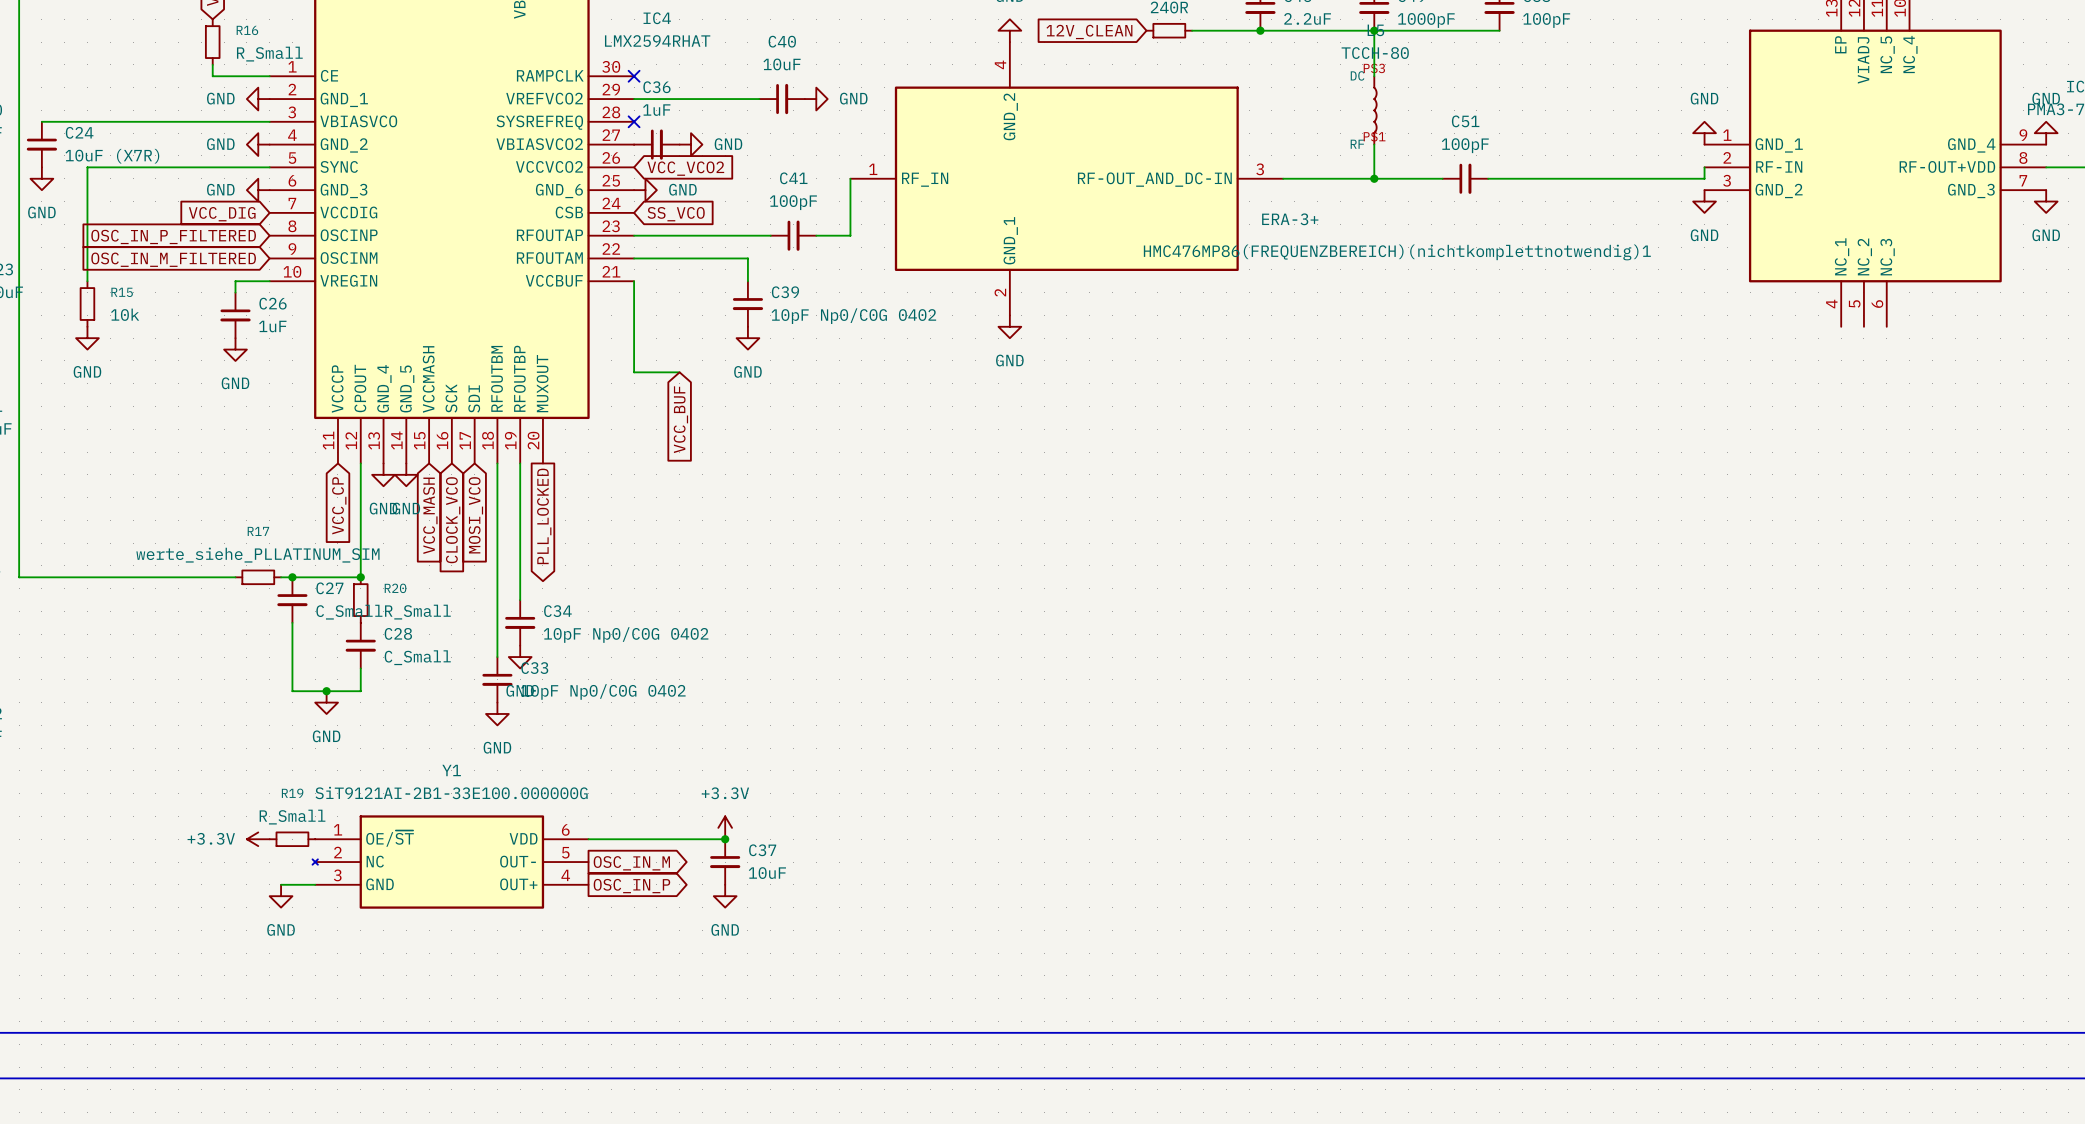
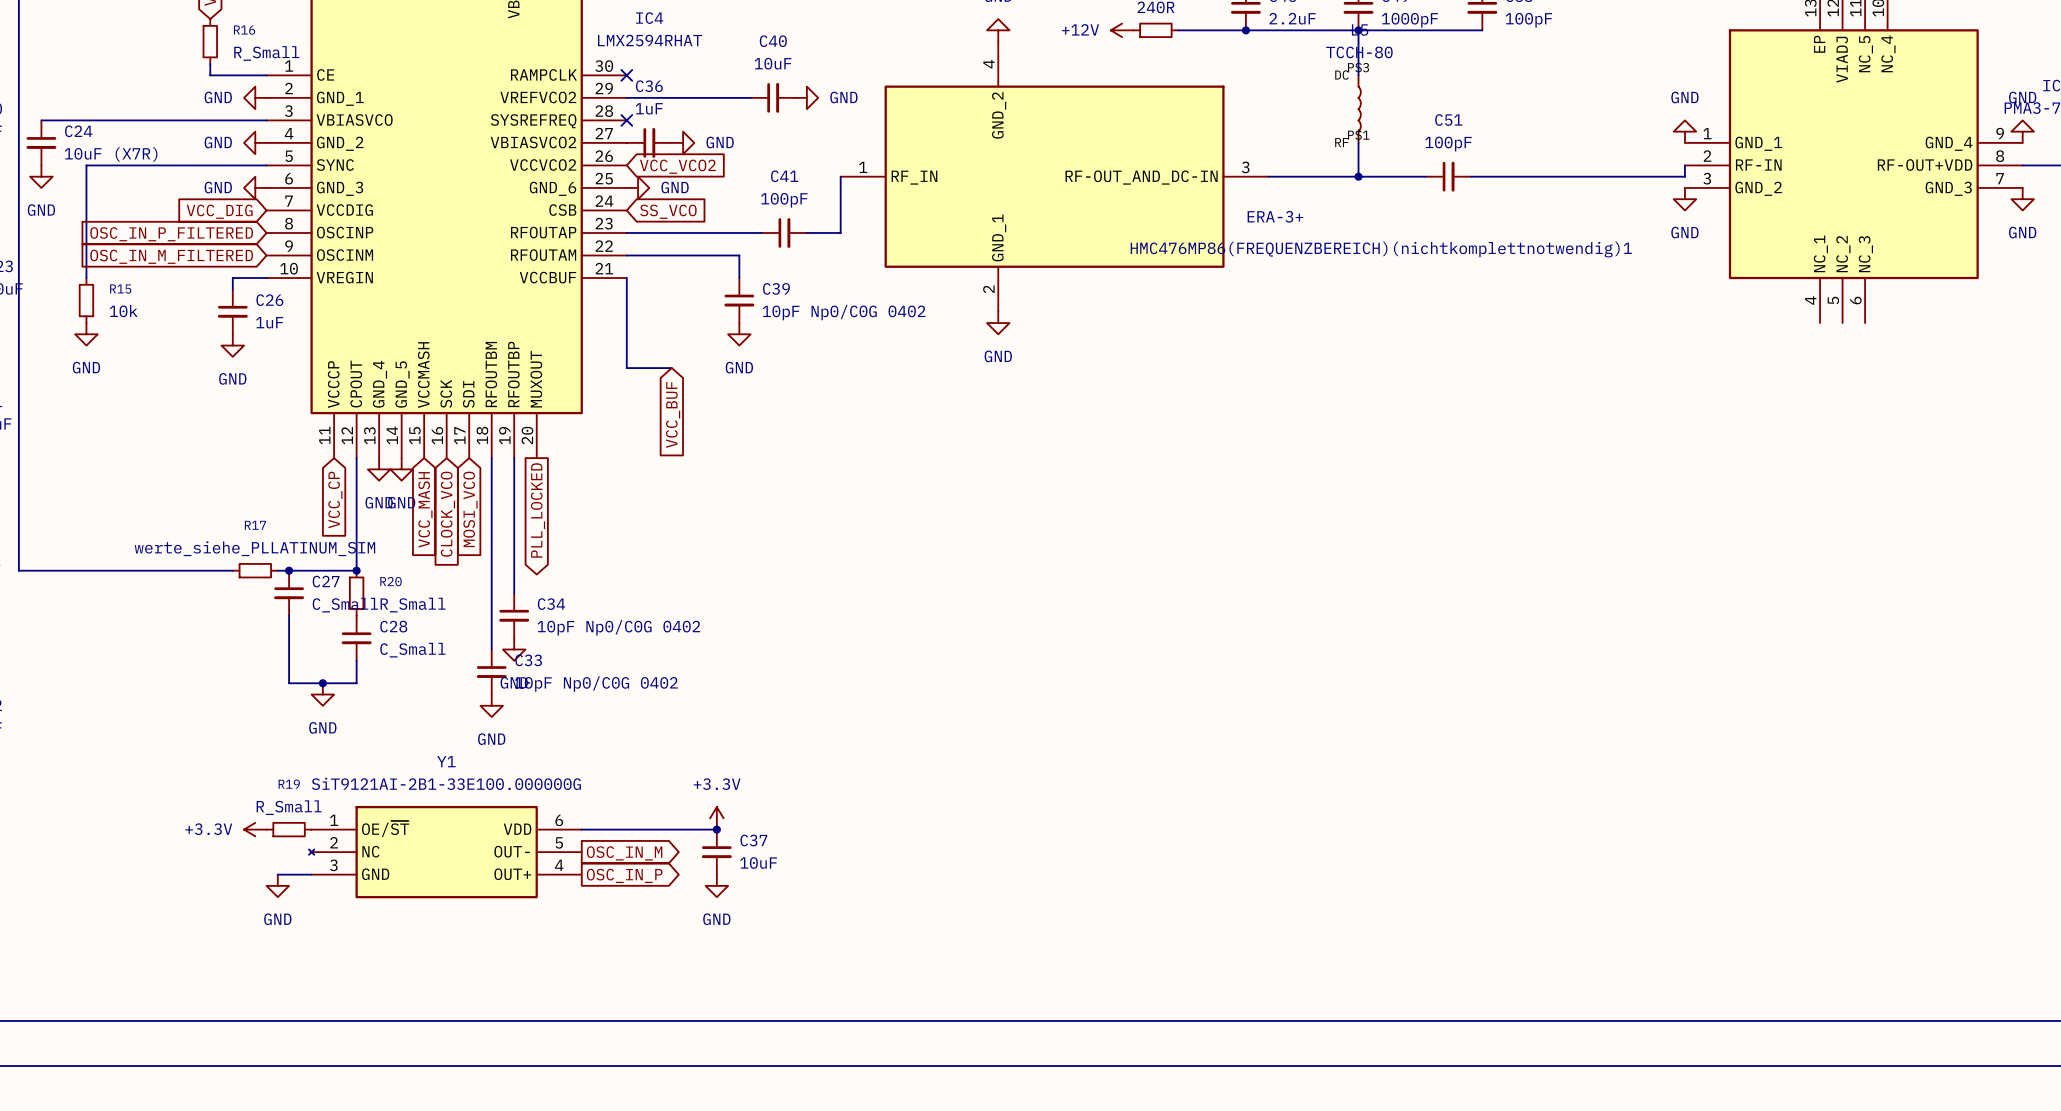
power symbol: none -> +12V (1122, 30)
global label: 12V_CLEAN (1089, 31) -> none

